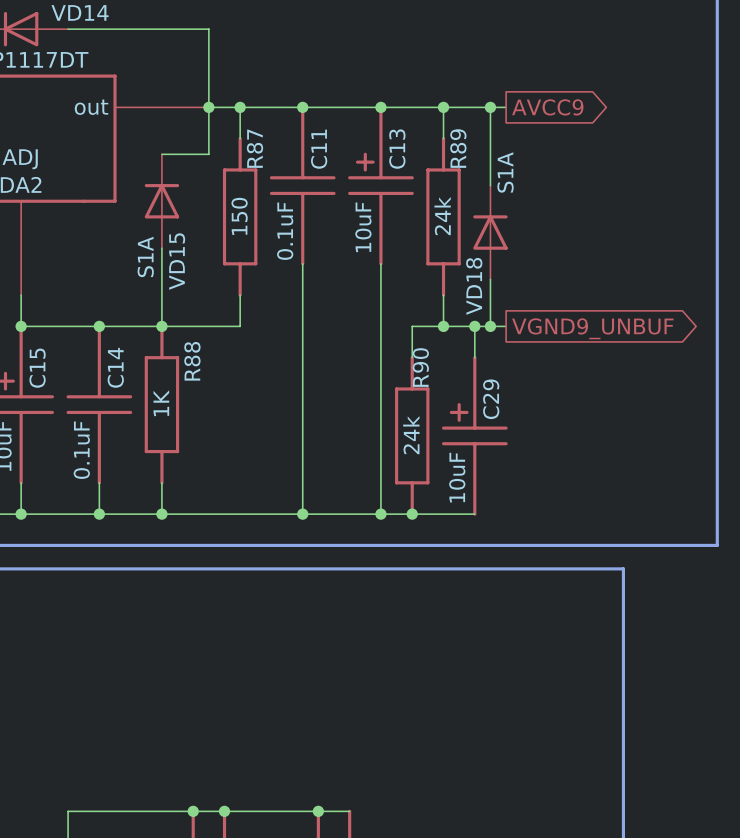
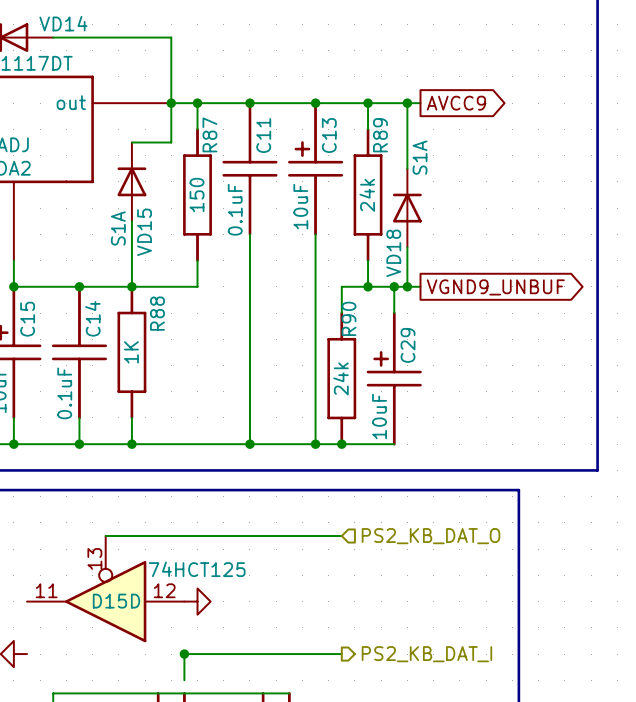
wire: none -> (105, 536) (341, 536)
hierarchical label: none -> PS2_KB_DAT_O (431, 536)
D15D: none -> 74HCT125 (105, 589)
power symbol: none -> (197, 601)
power symbol: none -> (13, 654)
junction: none -> (184, 654)
wire: none -> (341, 654) (184, 654) (184, 680)
hierarchical label: none -> PS2_KB_DAT_I (426, 654)
junction: (193, 811) -> none
junction: (224, 811) -> none
junction: (318, 811) -> none

